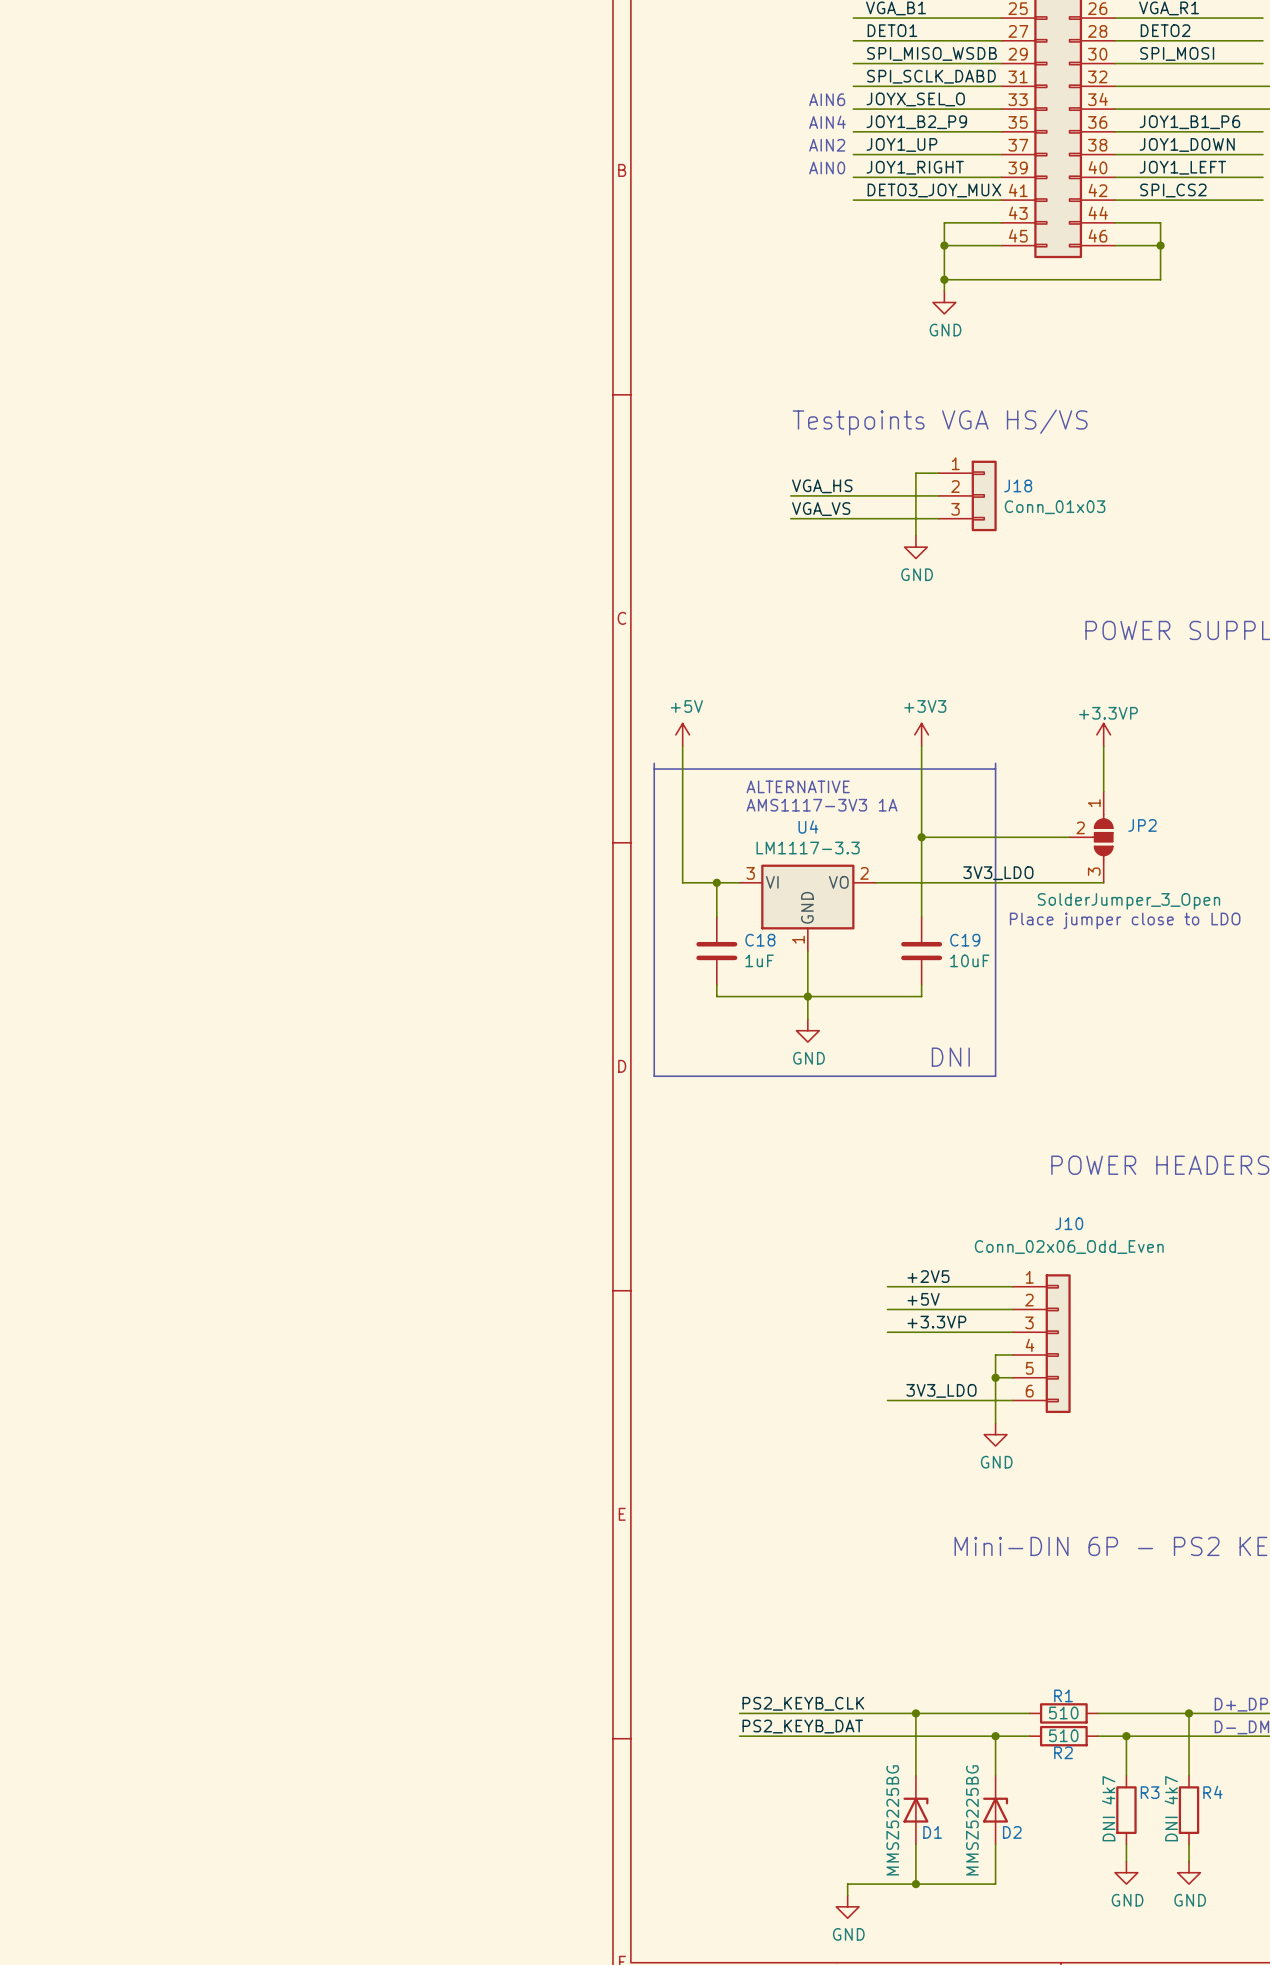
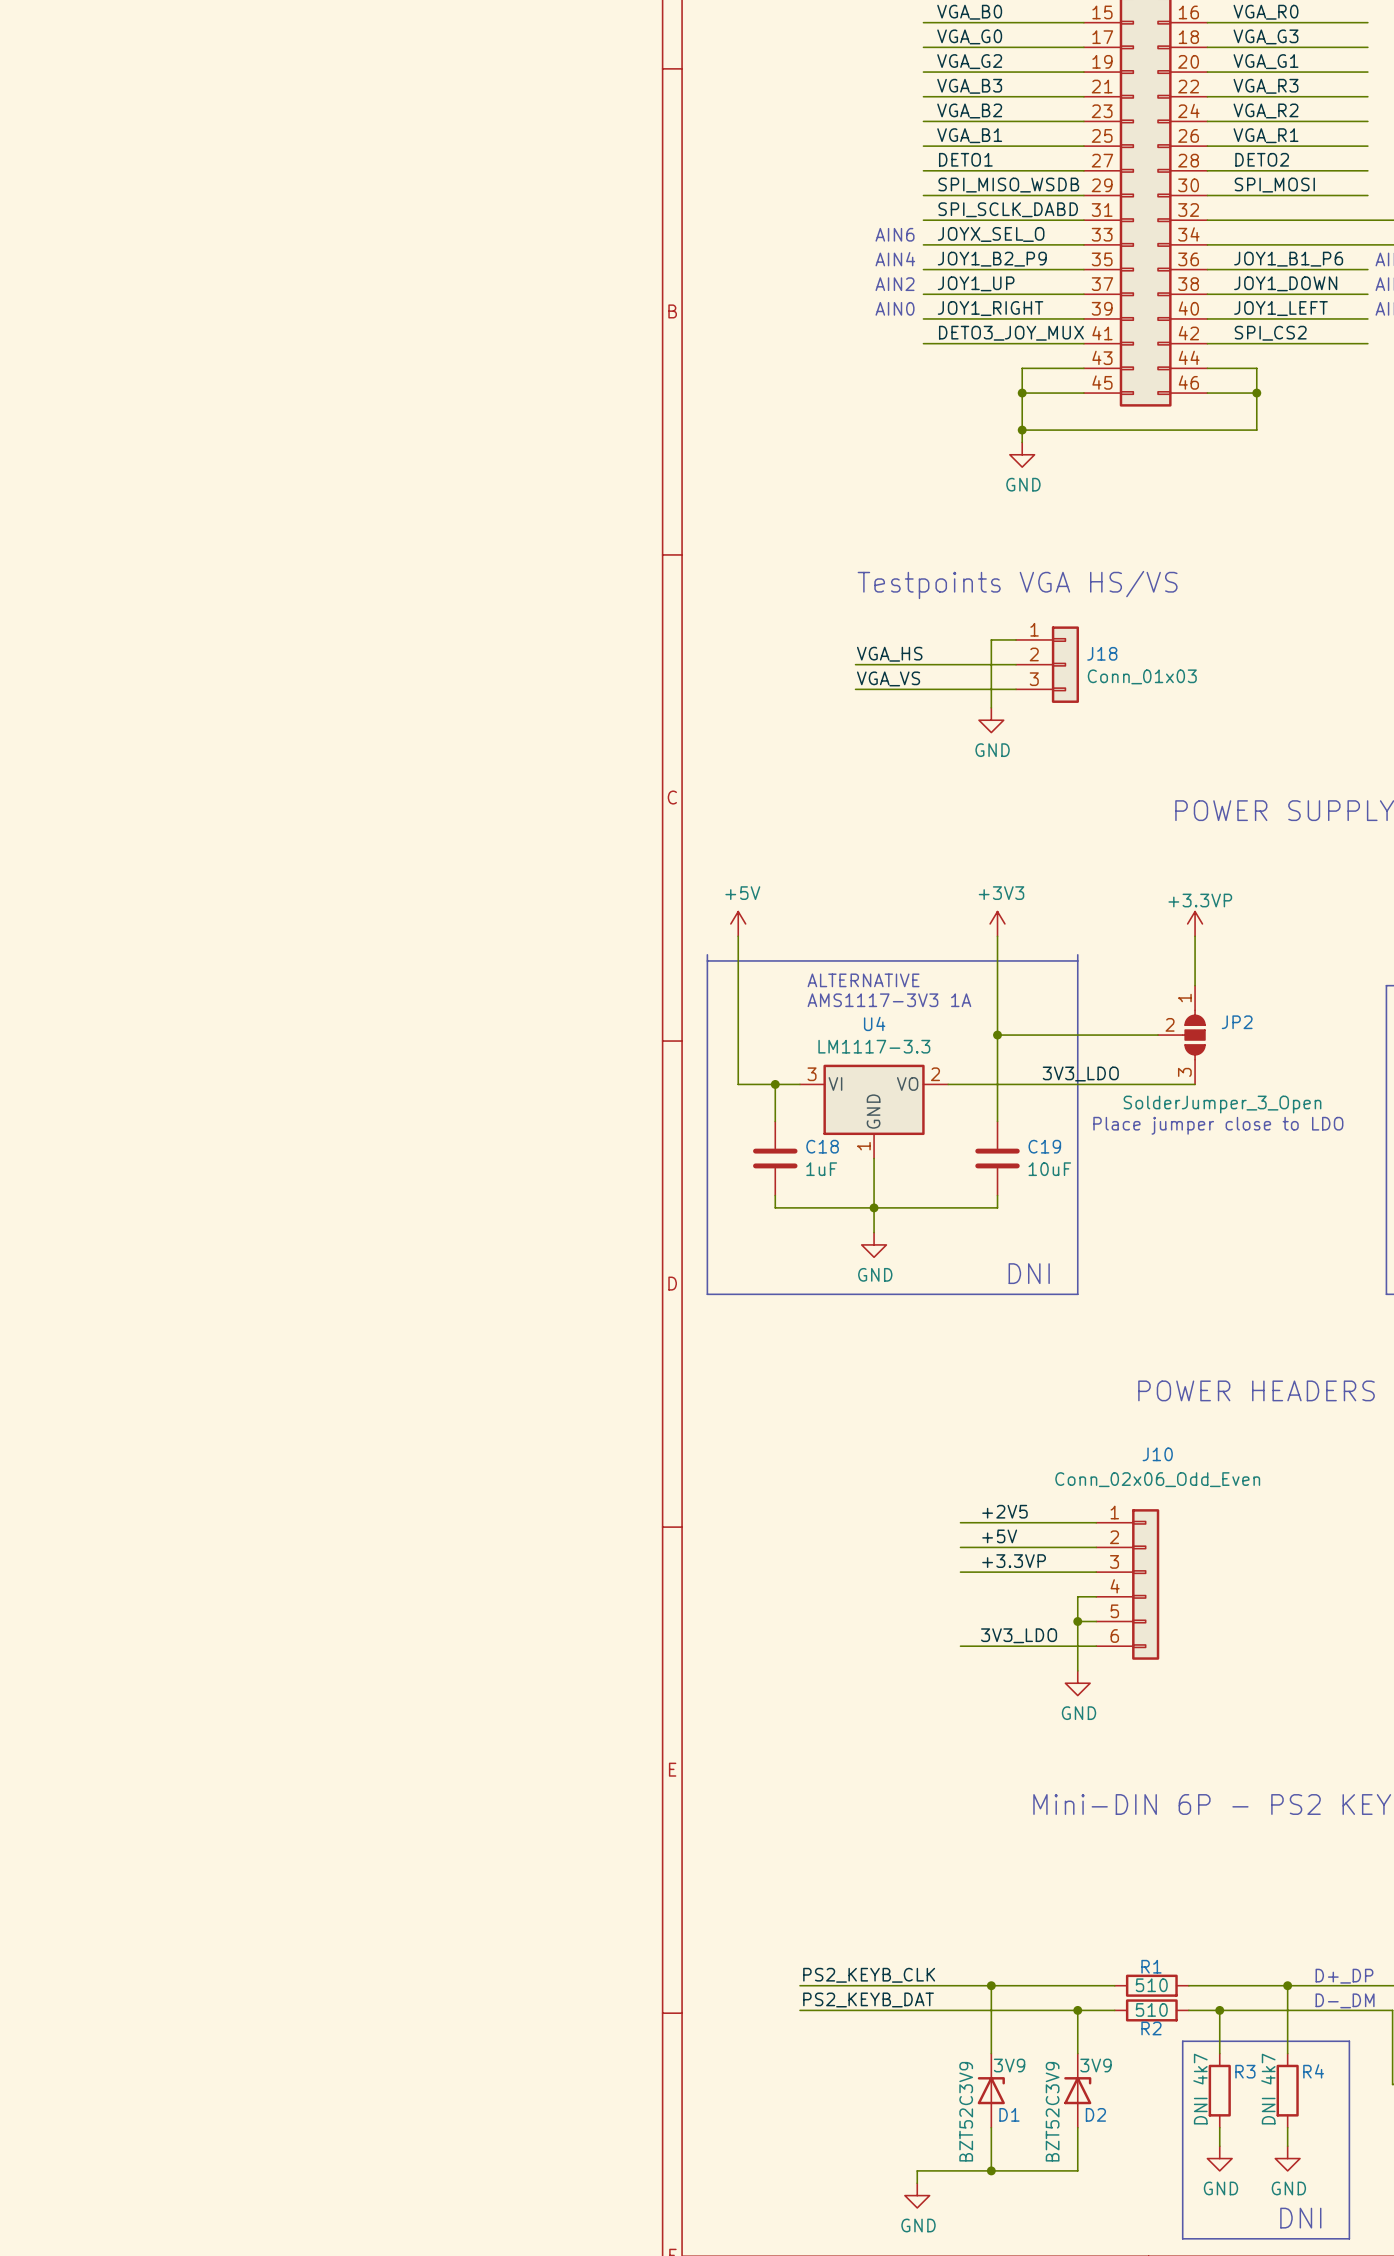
line: none -> (1182, 2041) (1349, 2041) (1349, 2238) (1182, 2238) (1182, 2041)
D1 text: none -> 3V9 (1009, 2065)
D2 text: none -> 3V9 (1095, 2065)
D1 value: MMSZ5225BG (892, 1820) -> BZT52C3V9 (966, 2111)
D2 value: MMSZ5225BG (972, 1820) -> BZT52C3V9 (1052, 2111)
text: none -> DNI (1300, 2218)

